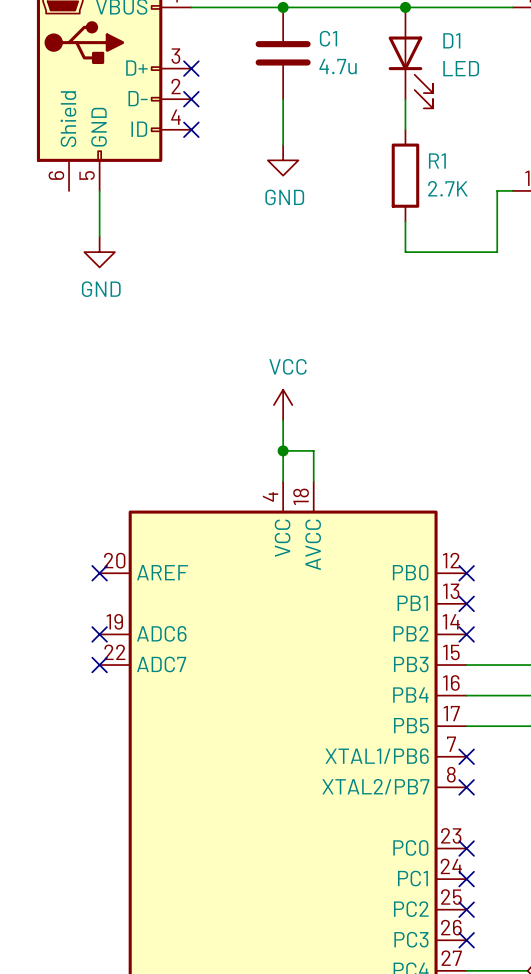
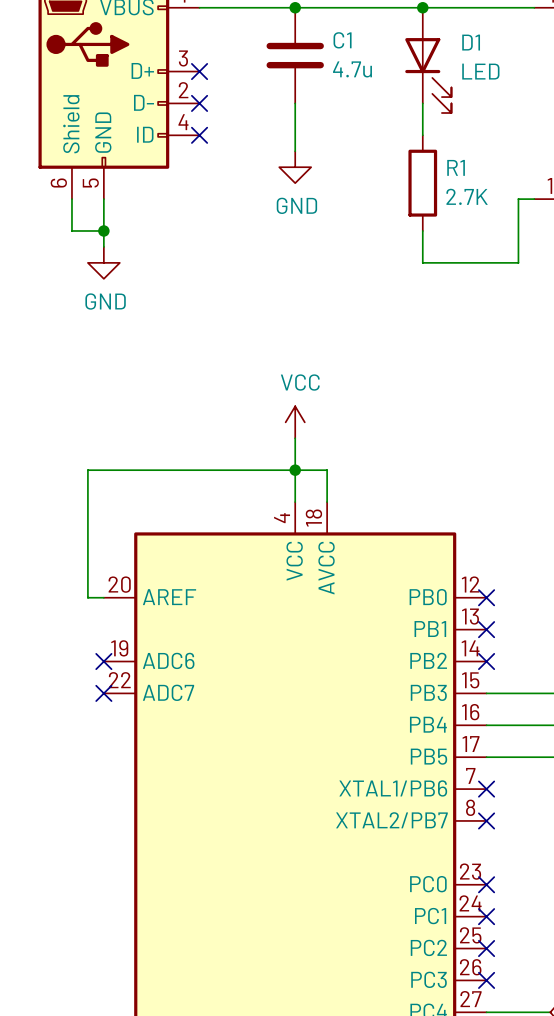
wire: none -> (71, 199) (71, 230) (103, 230)
junction: none -> (103, 230)
wire: none -> (295, 470) (87, 470) (87, 597) (103, 597)
no-connect mark: (99, 573) -> none

